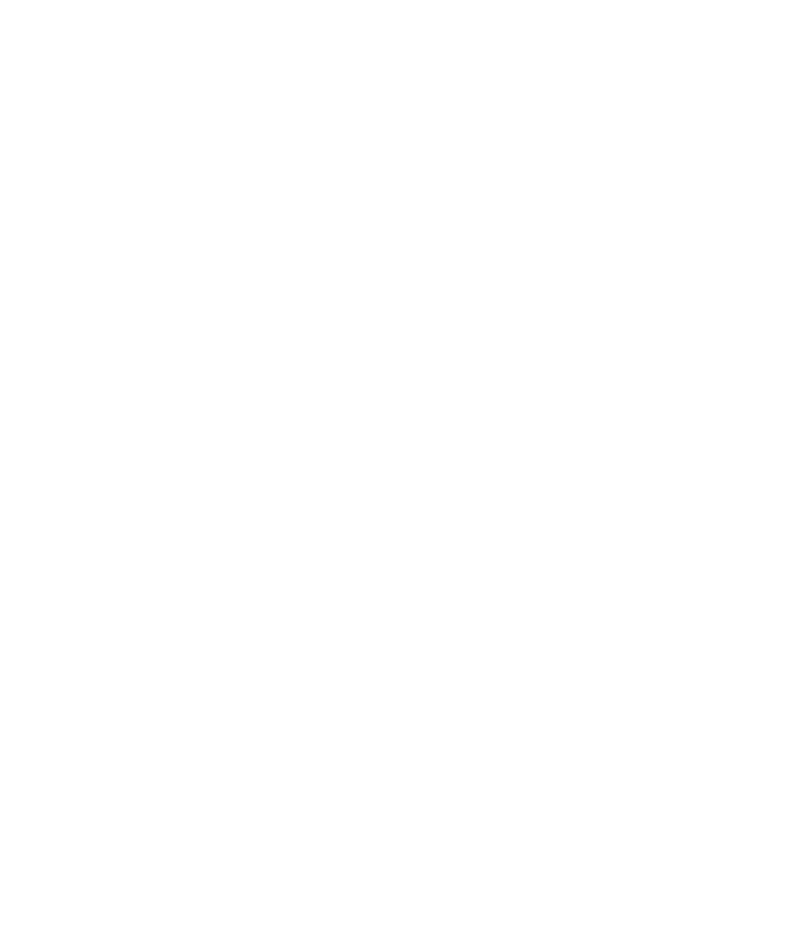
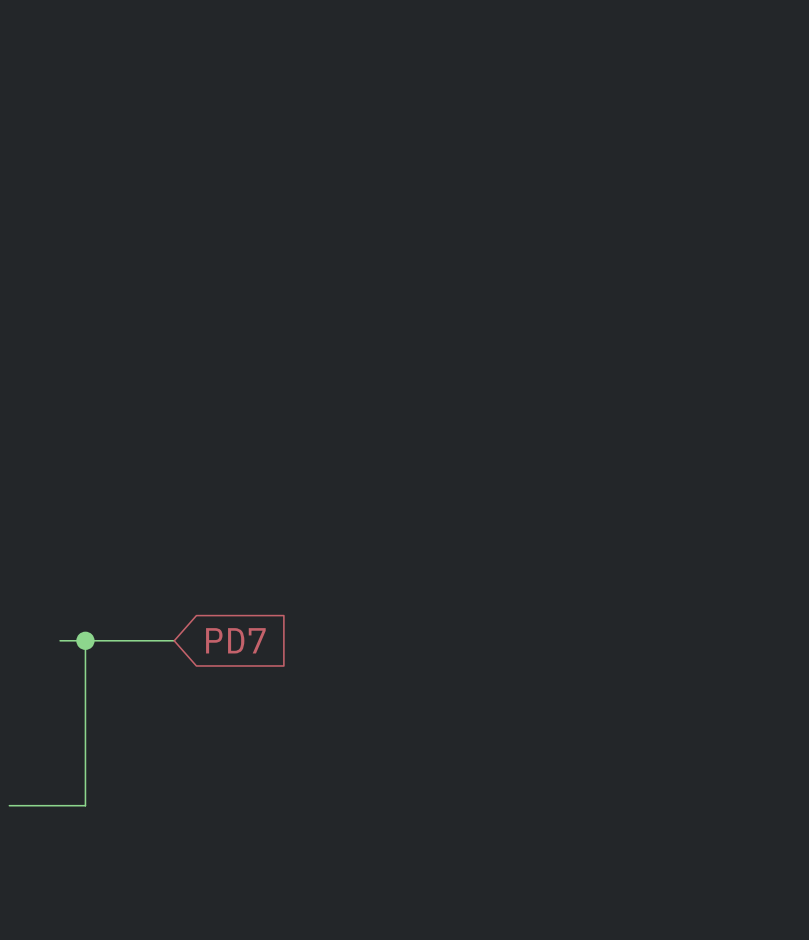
wire: none -> (60, 640) (174, 640)
wire: none -> (85, 640) (85, 805) (9, 805)
junction: none -> (85, 640)
global label: none -> PD7 (235, 640)

